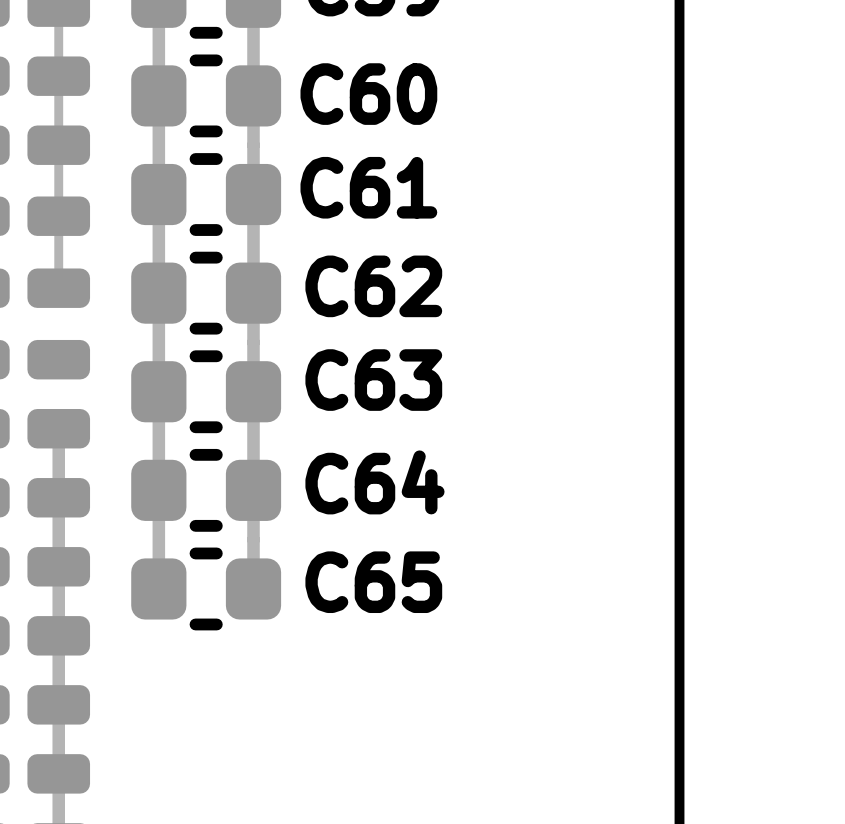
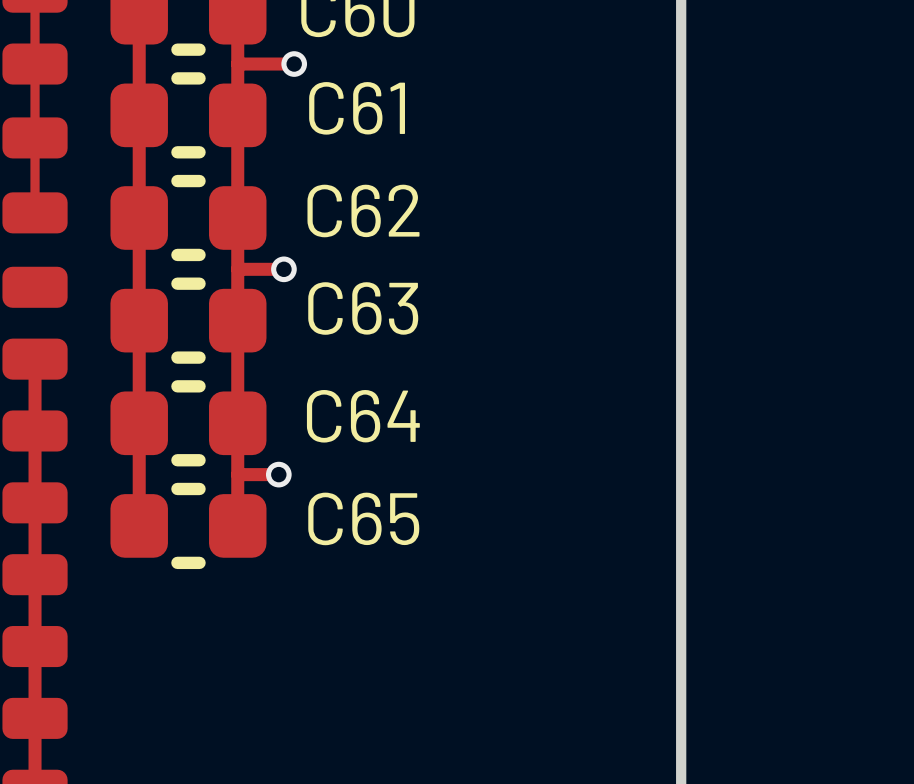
track: none -> (237, 64) (294, 64)
via: none -> (294, 64)
track: none -> (237, 269) (283, 269)
via: none -> (283, 269)
track: none -> (237, 474) (278, 474)
via: none -> (278, 474)

